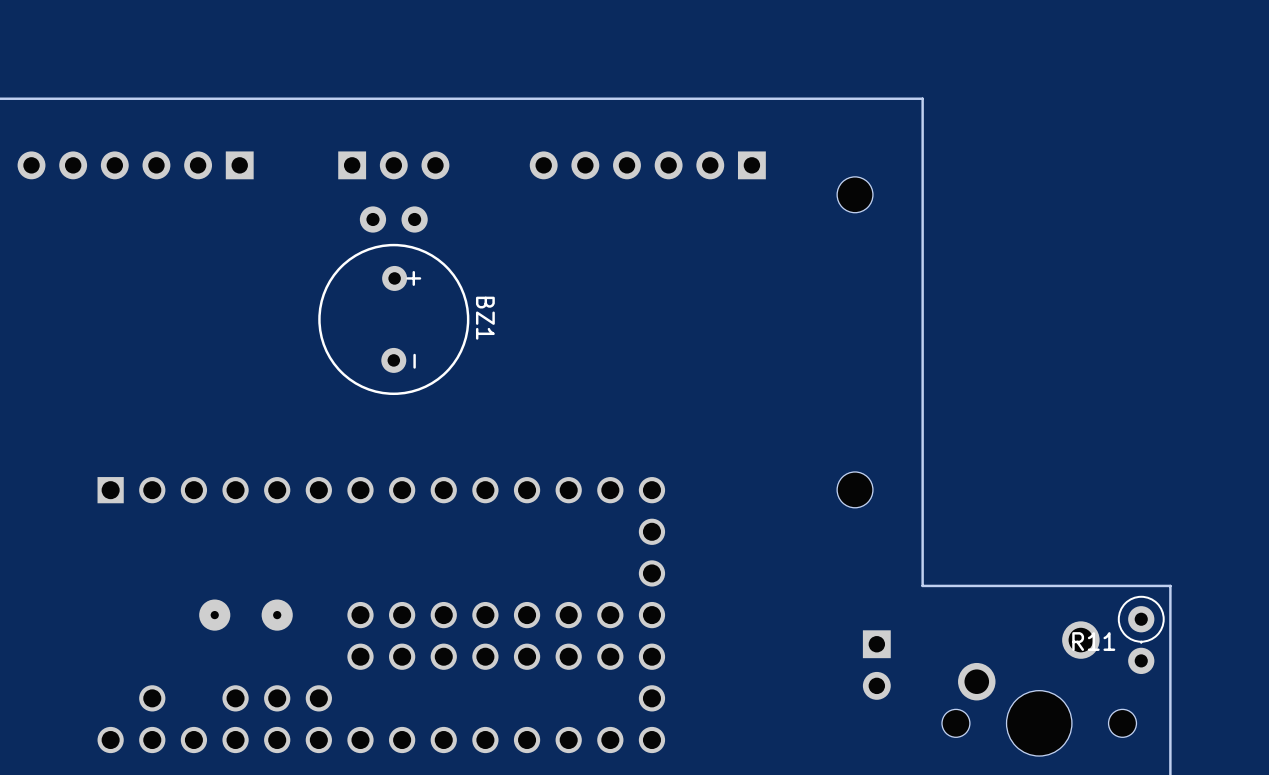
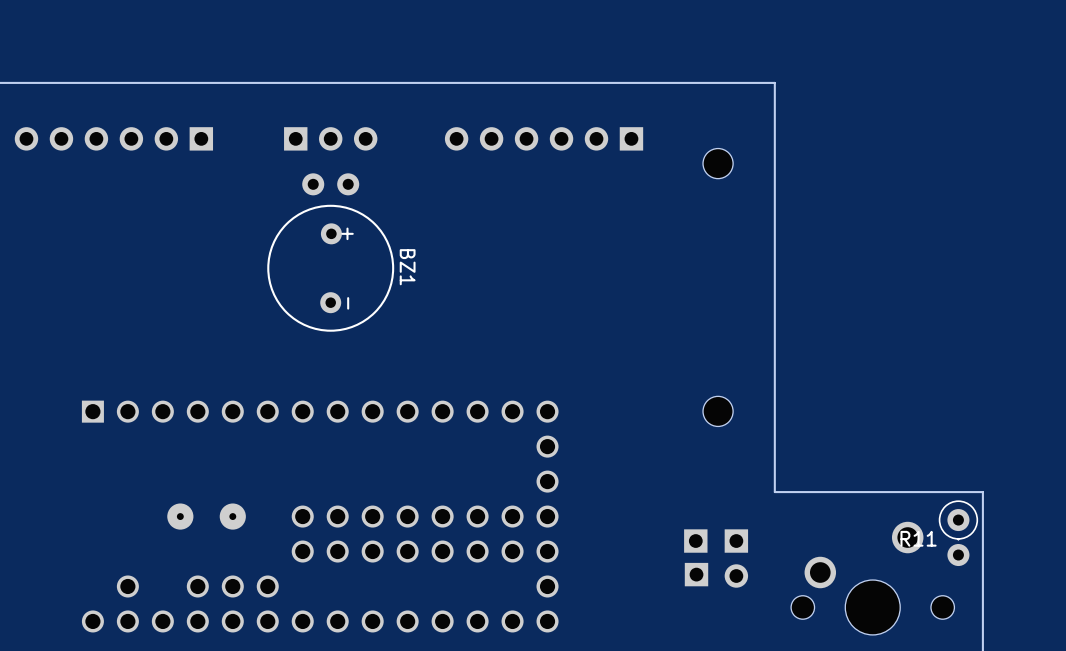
part: none -> (695, 541)
part: none -> (696, 574)

